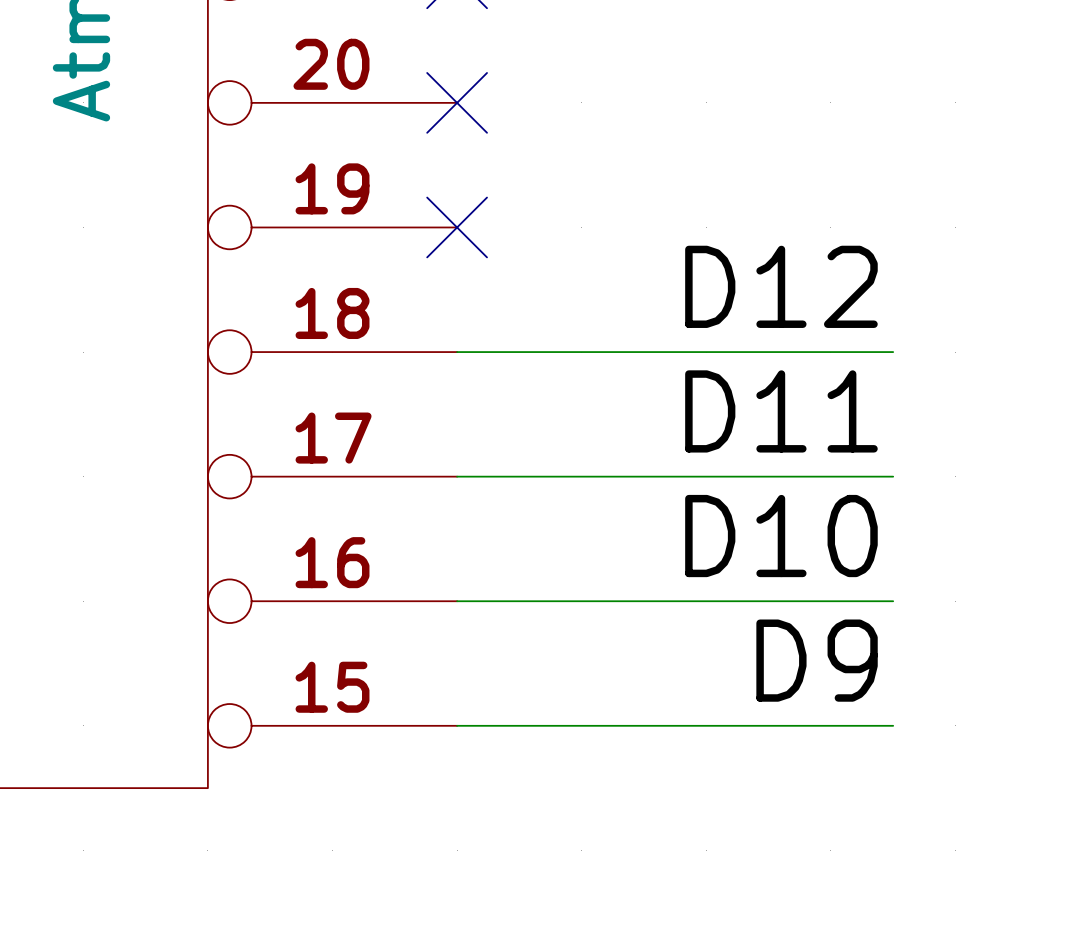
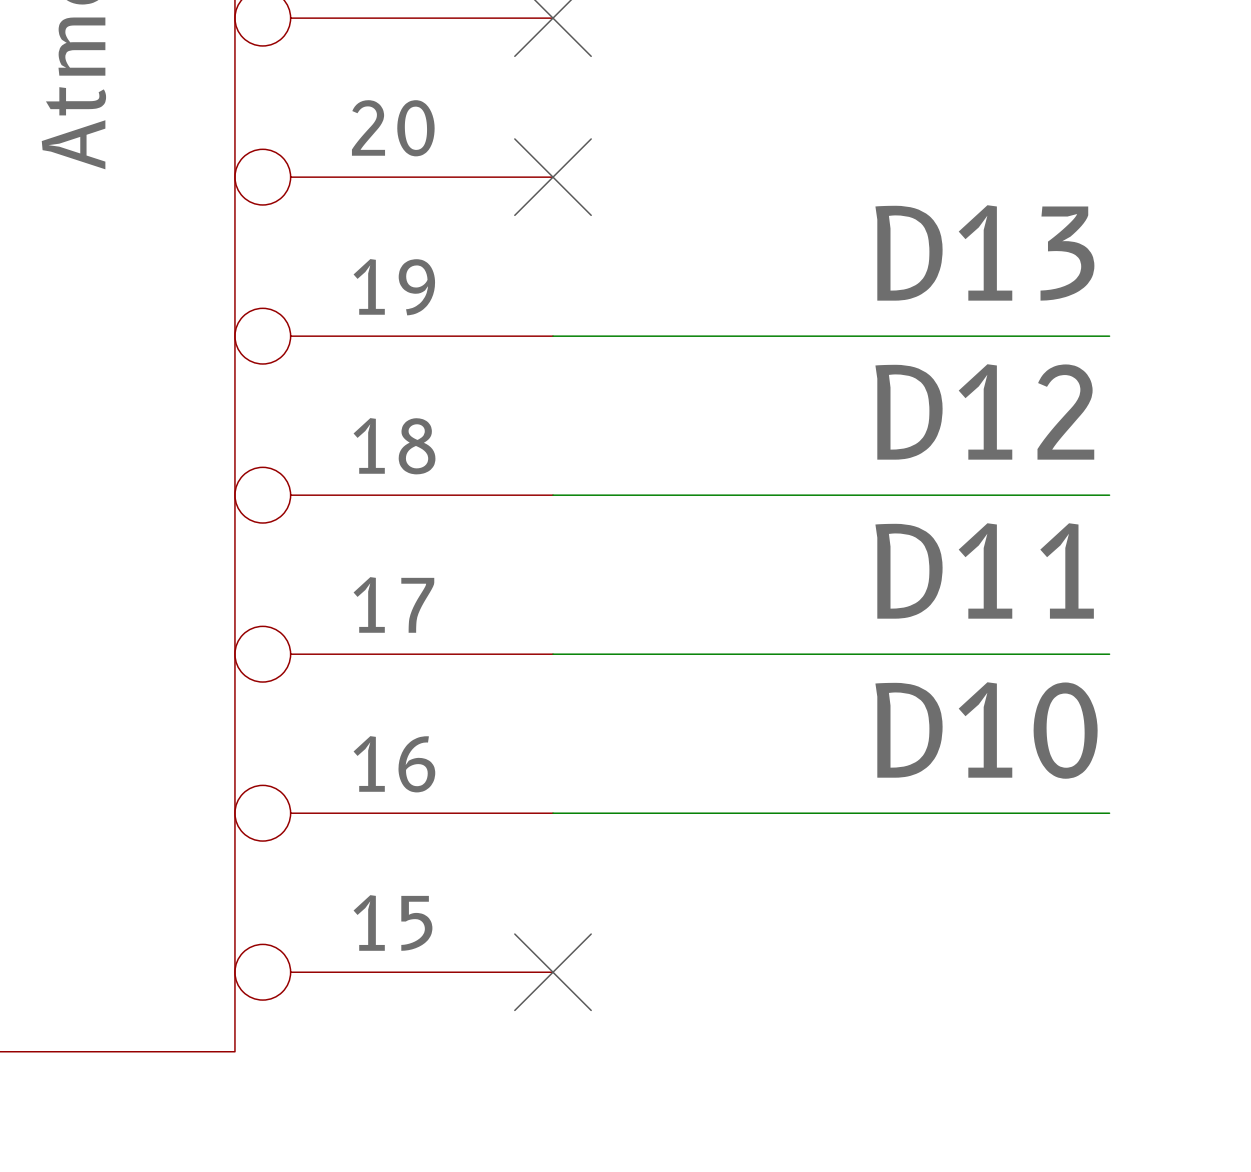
label: none -> D13 (984, 252)
no-connect mark: (457, 227) -> none
label: D9 (817, 660) -> none
wire: (457, 725) (893, 725) -> (553, 336) (1109, 336)
no-connect mark: none -> (553, 972)

